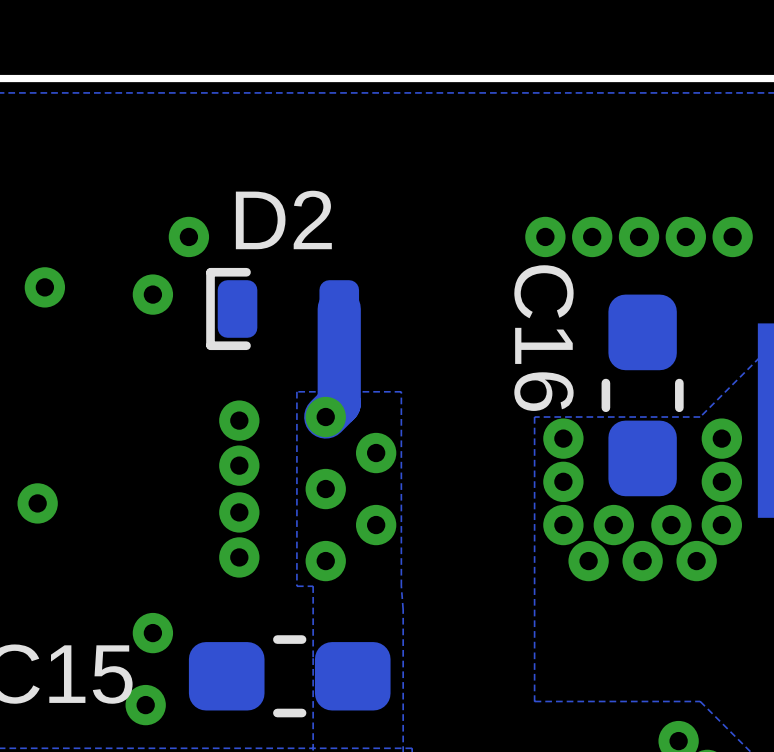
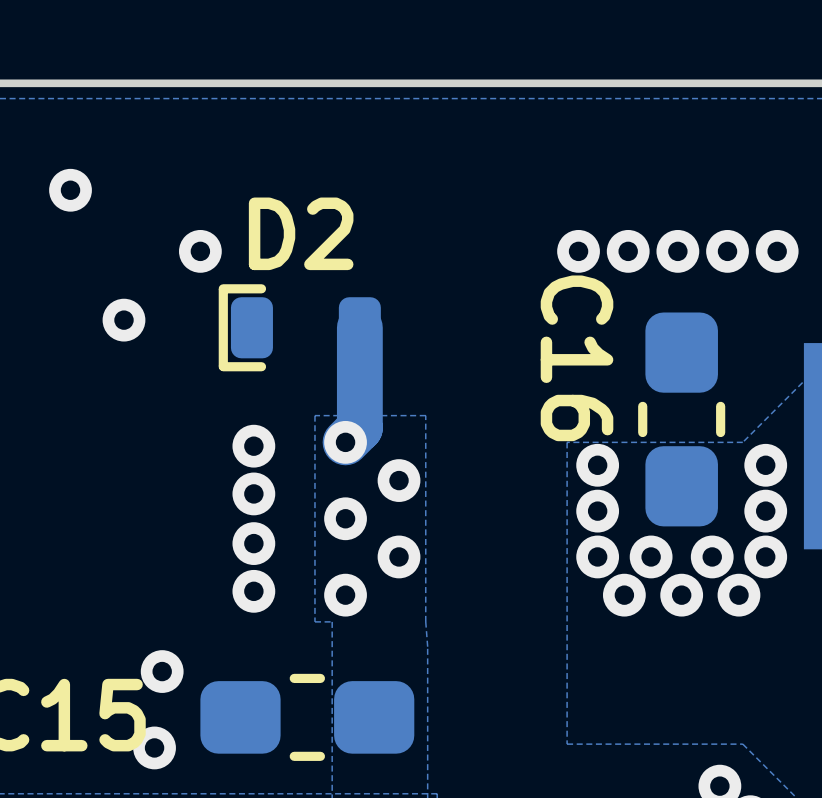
via: none -> (70, 190)
via: (44, 287) -> none
via position: (152, 294) -> (123, 320)
via: (37, 503) -> none

